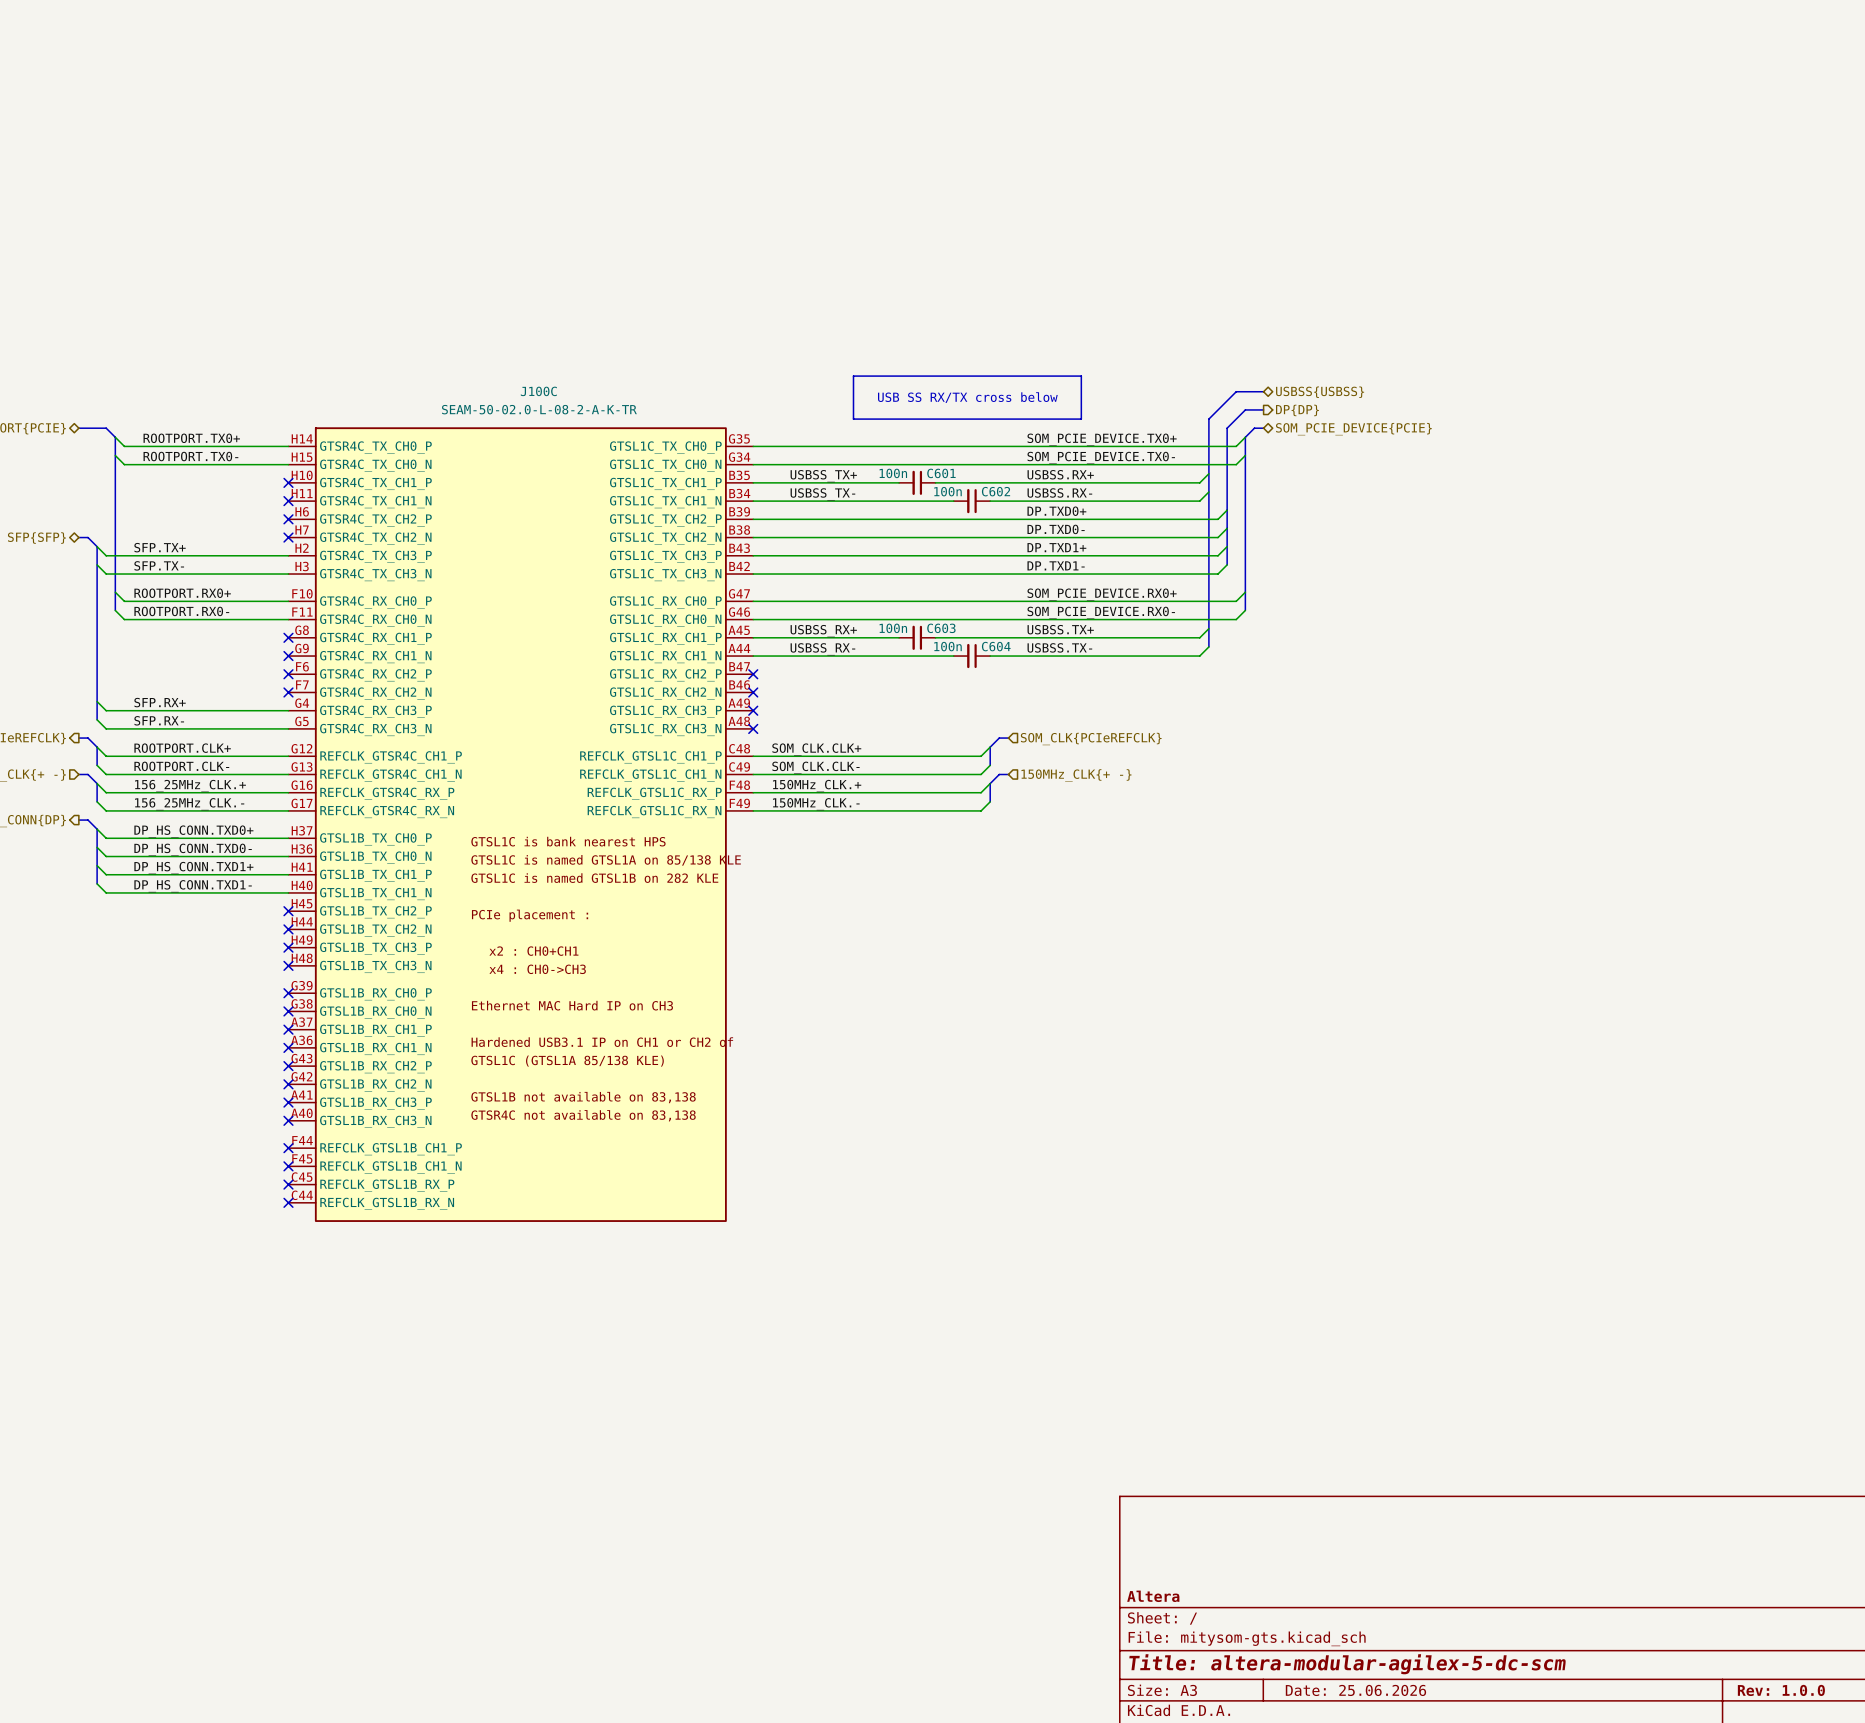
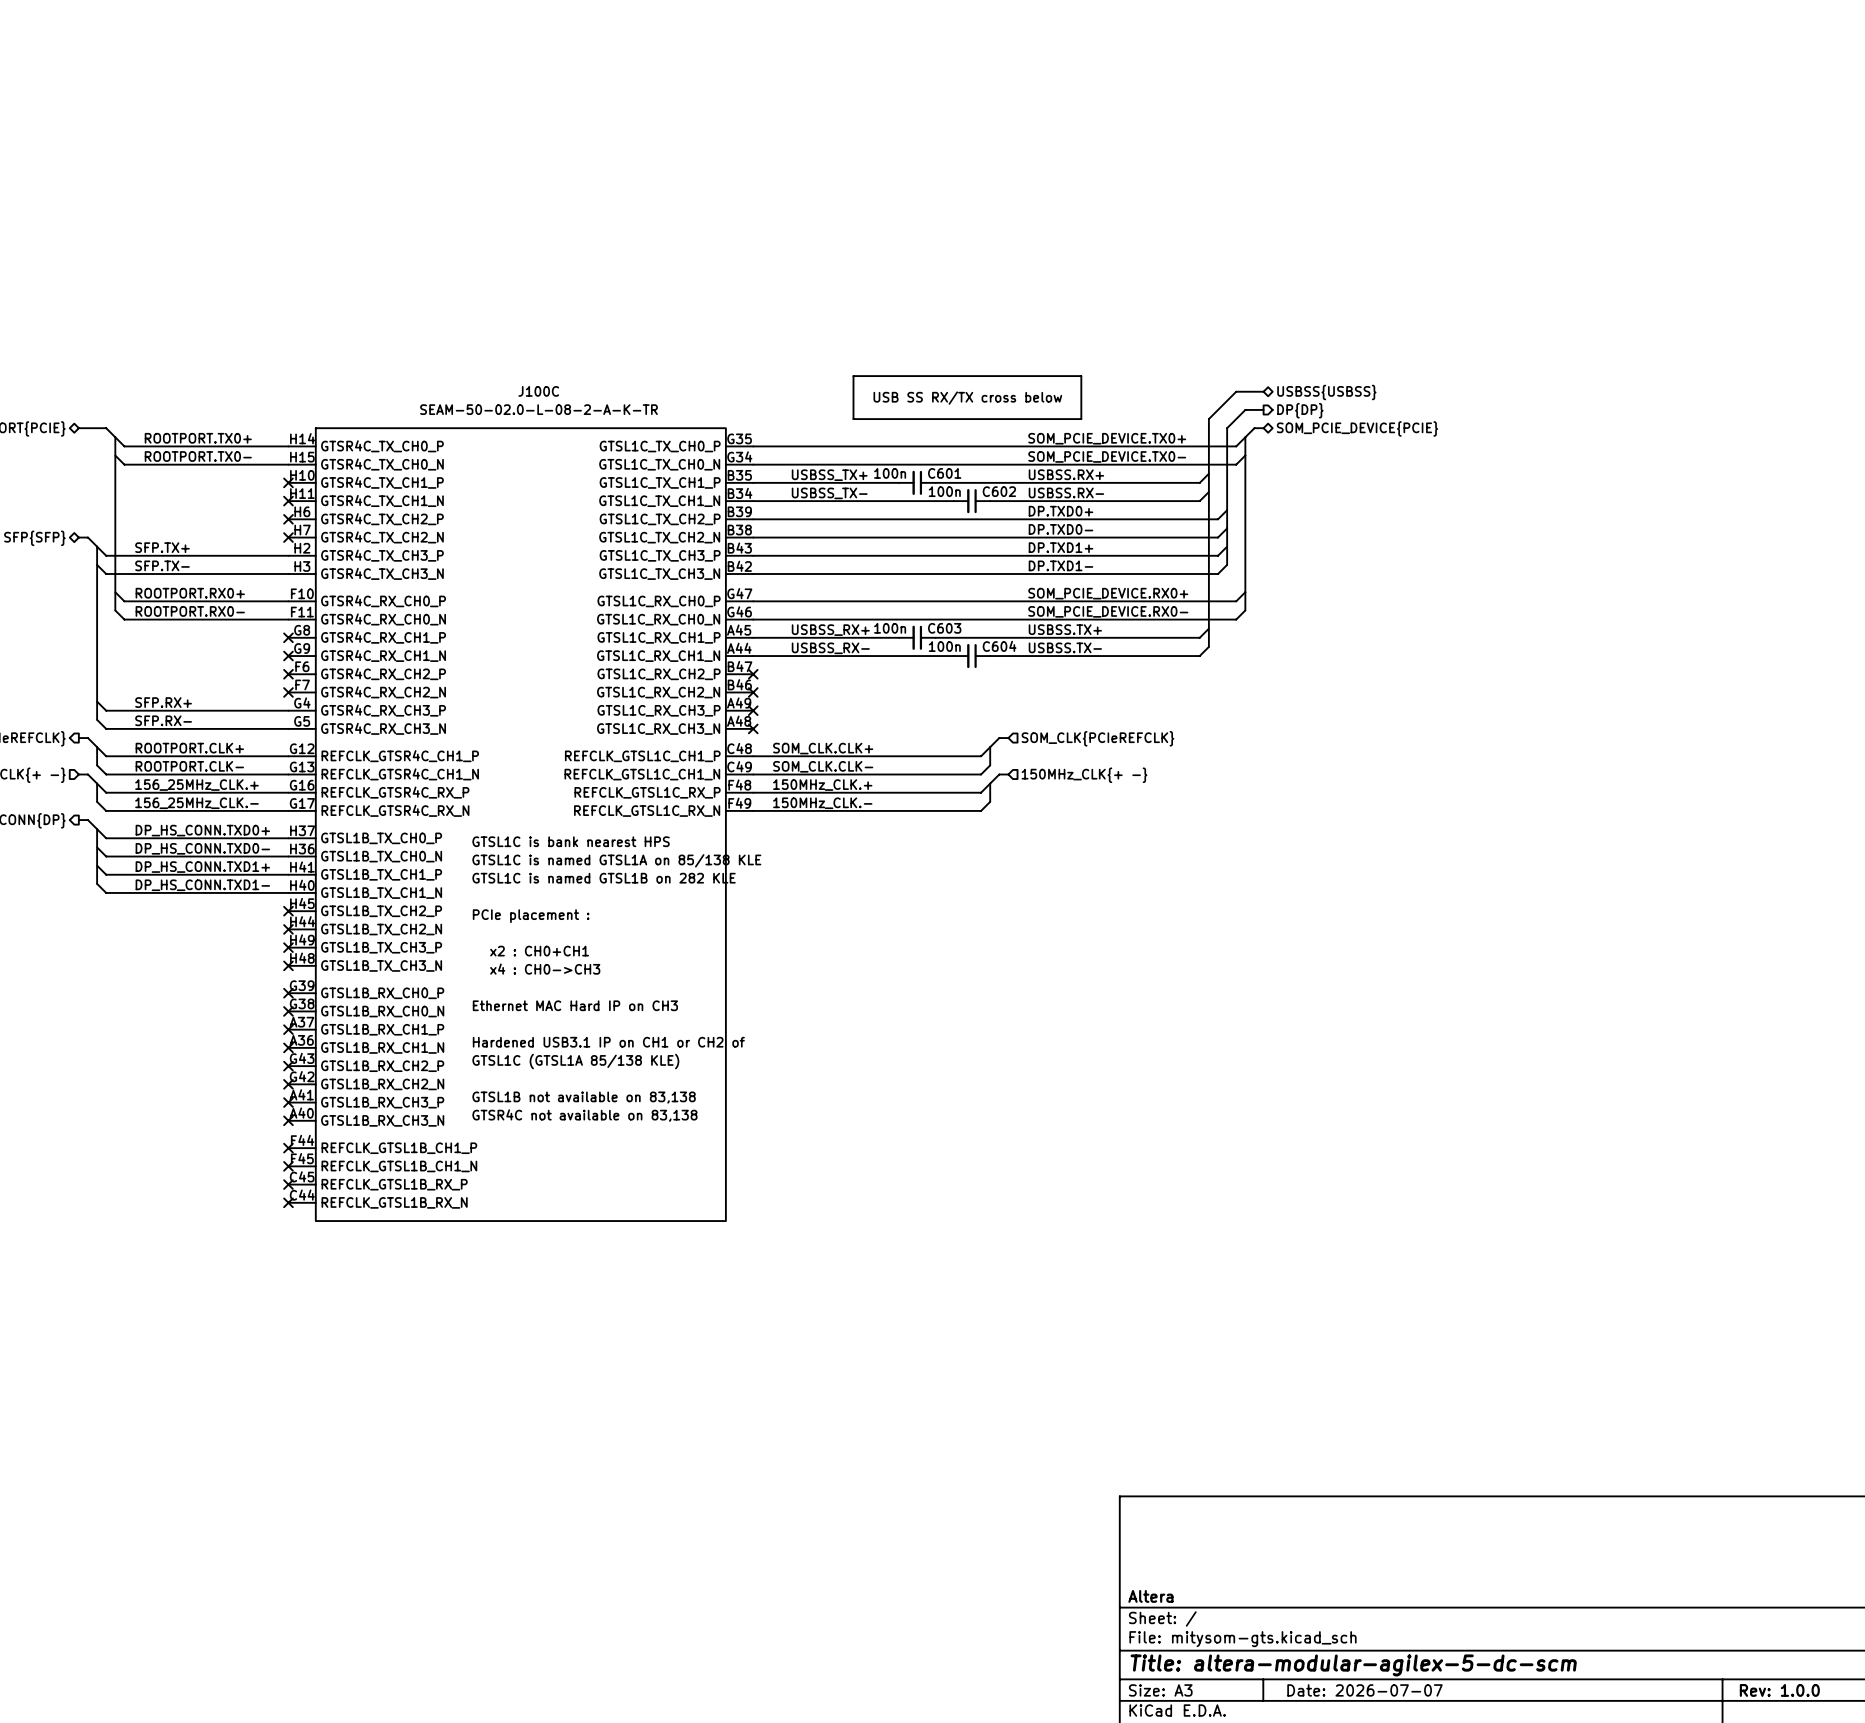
title block: Date: 25.06.2026 (1355, 1690) -> Date: 2026-07-07 (1364, 1690)

